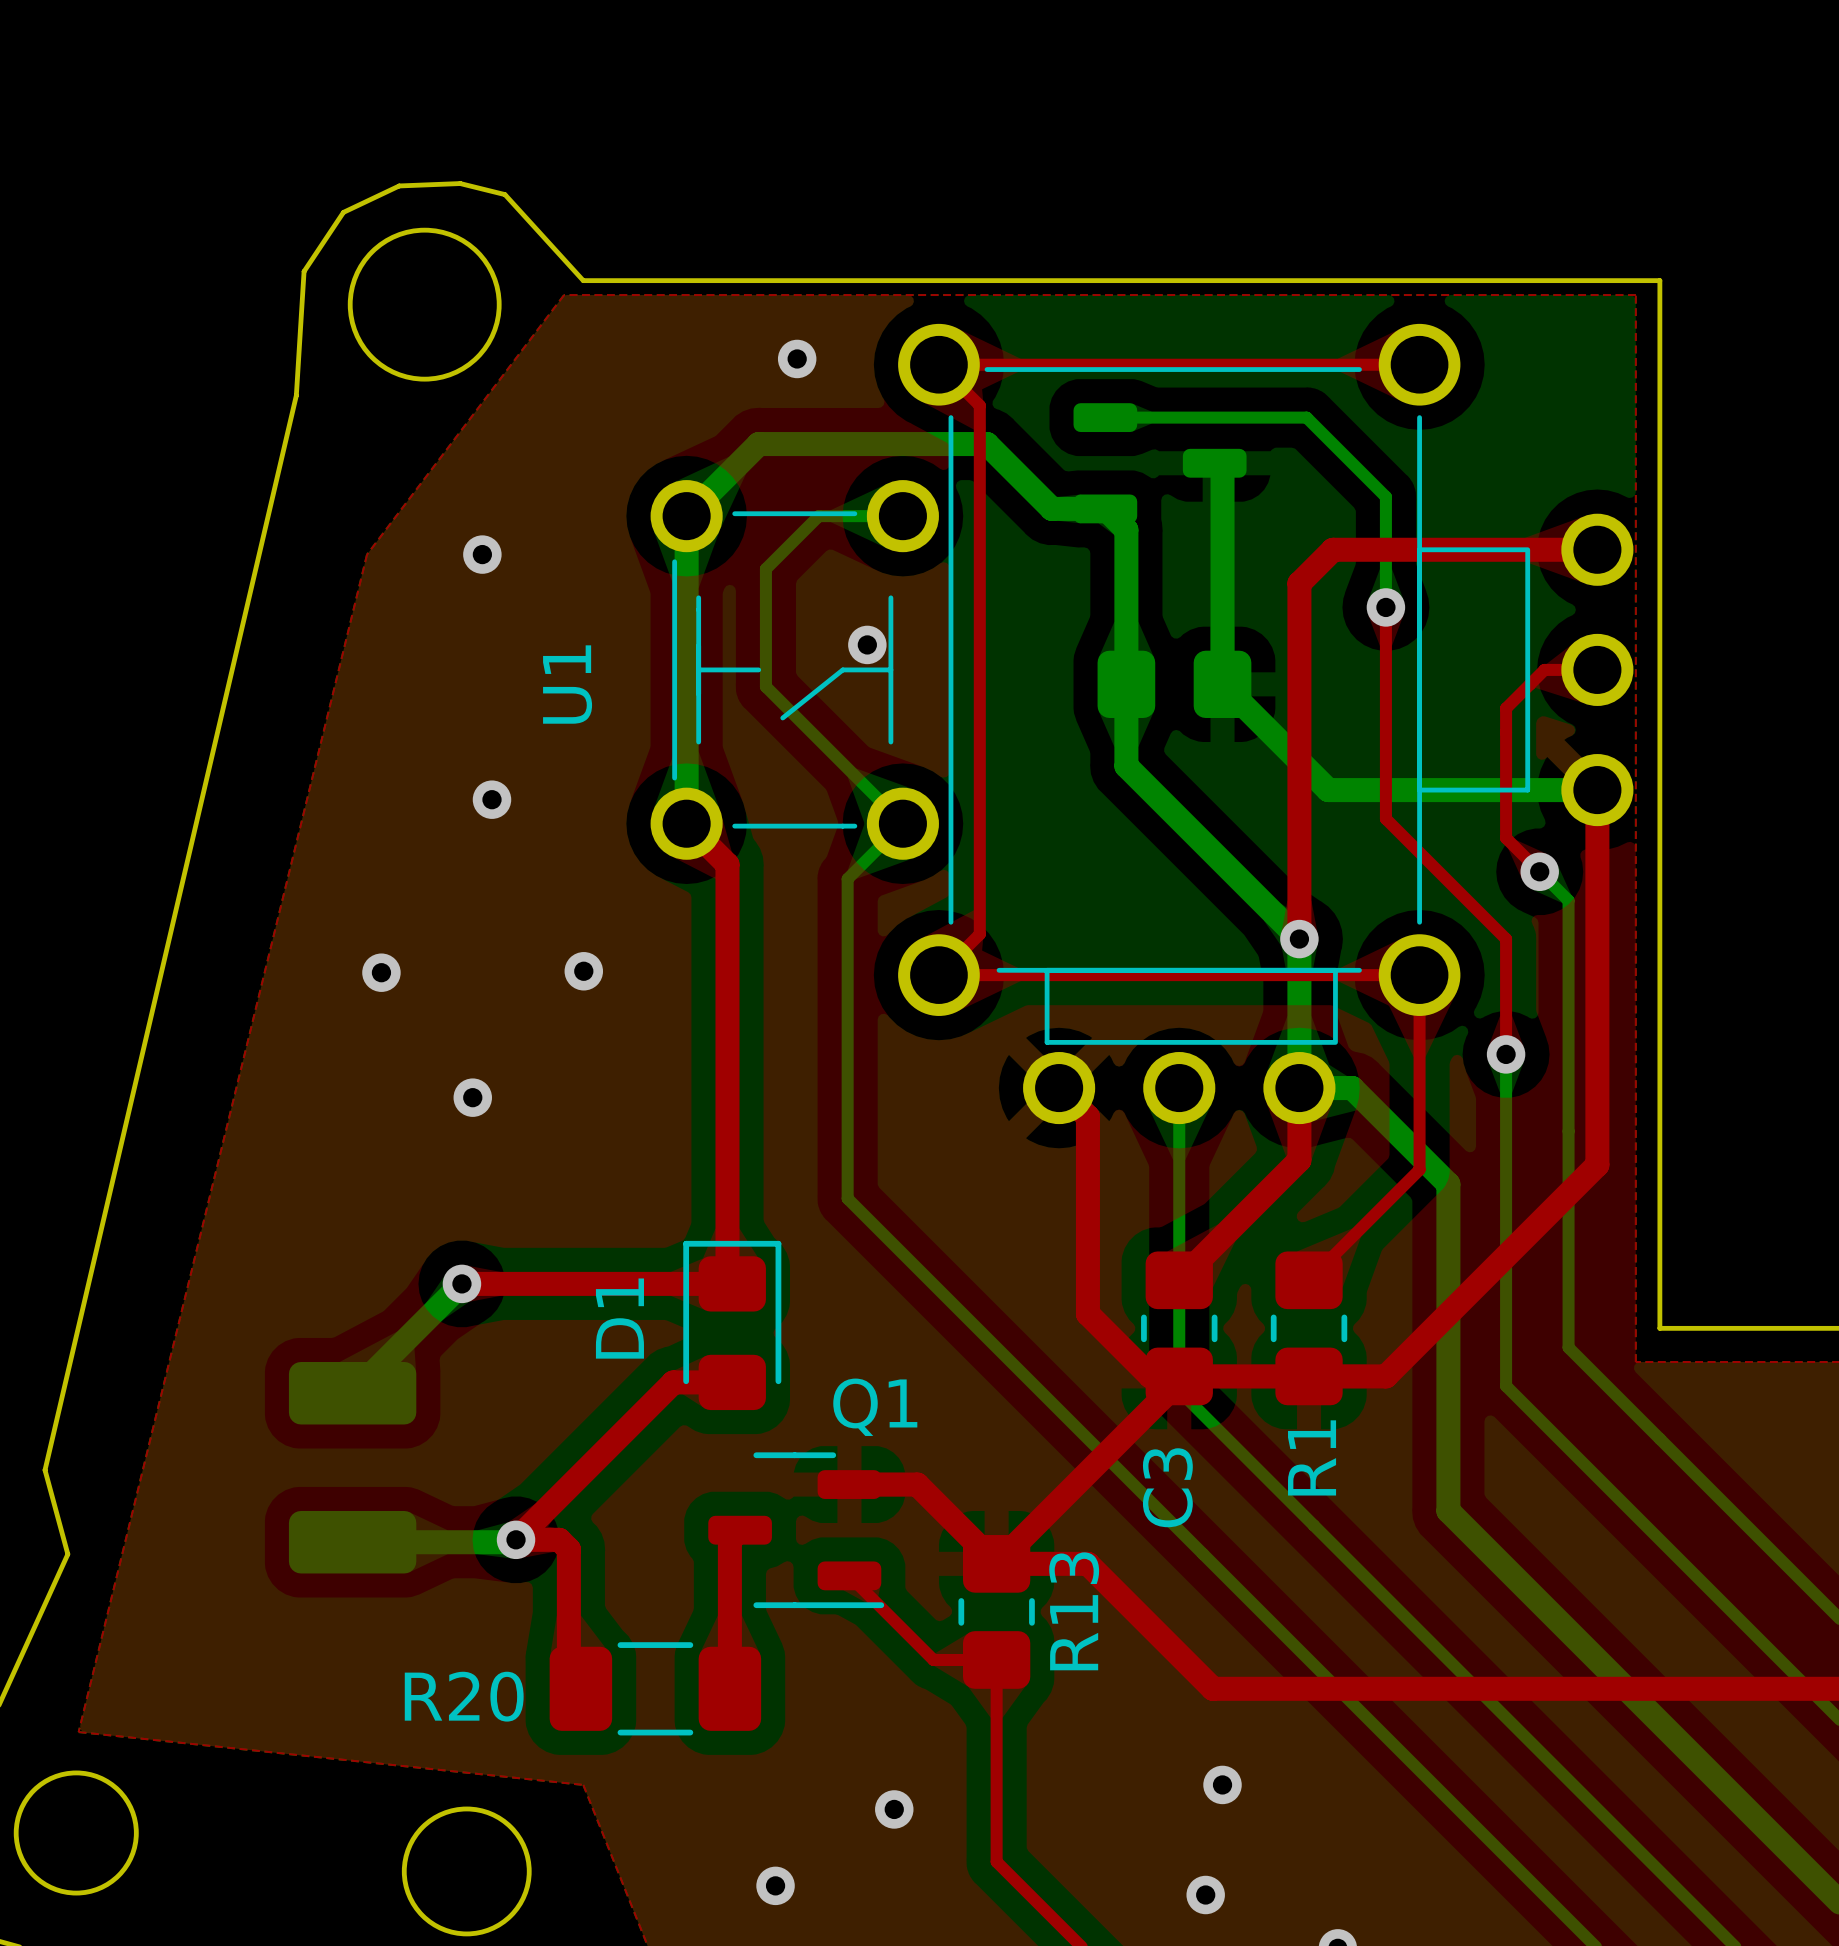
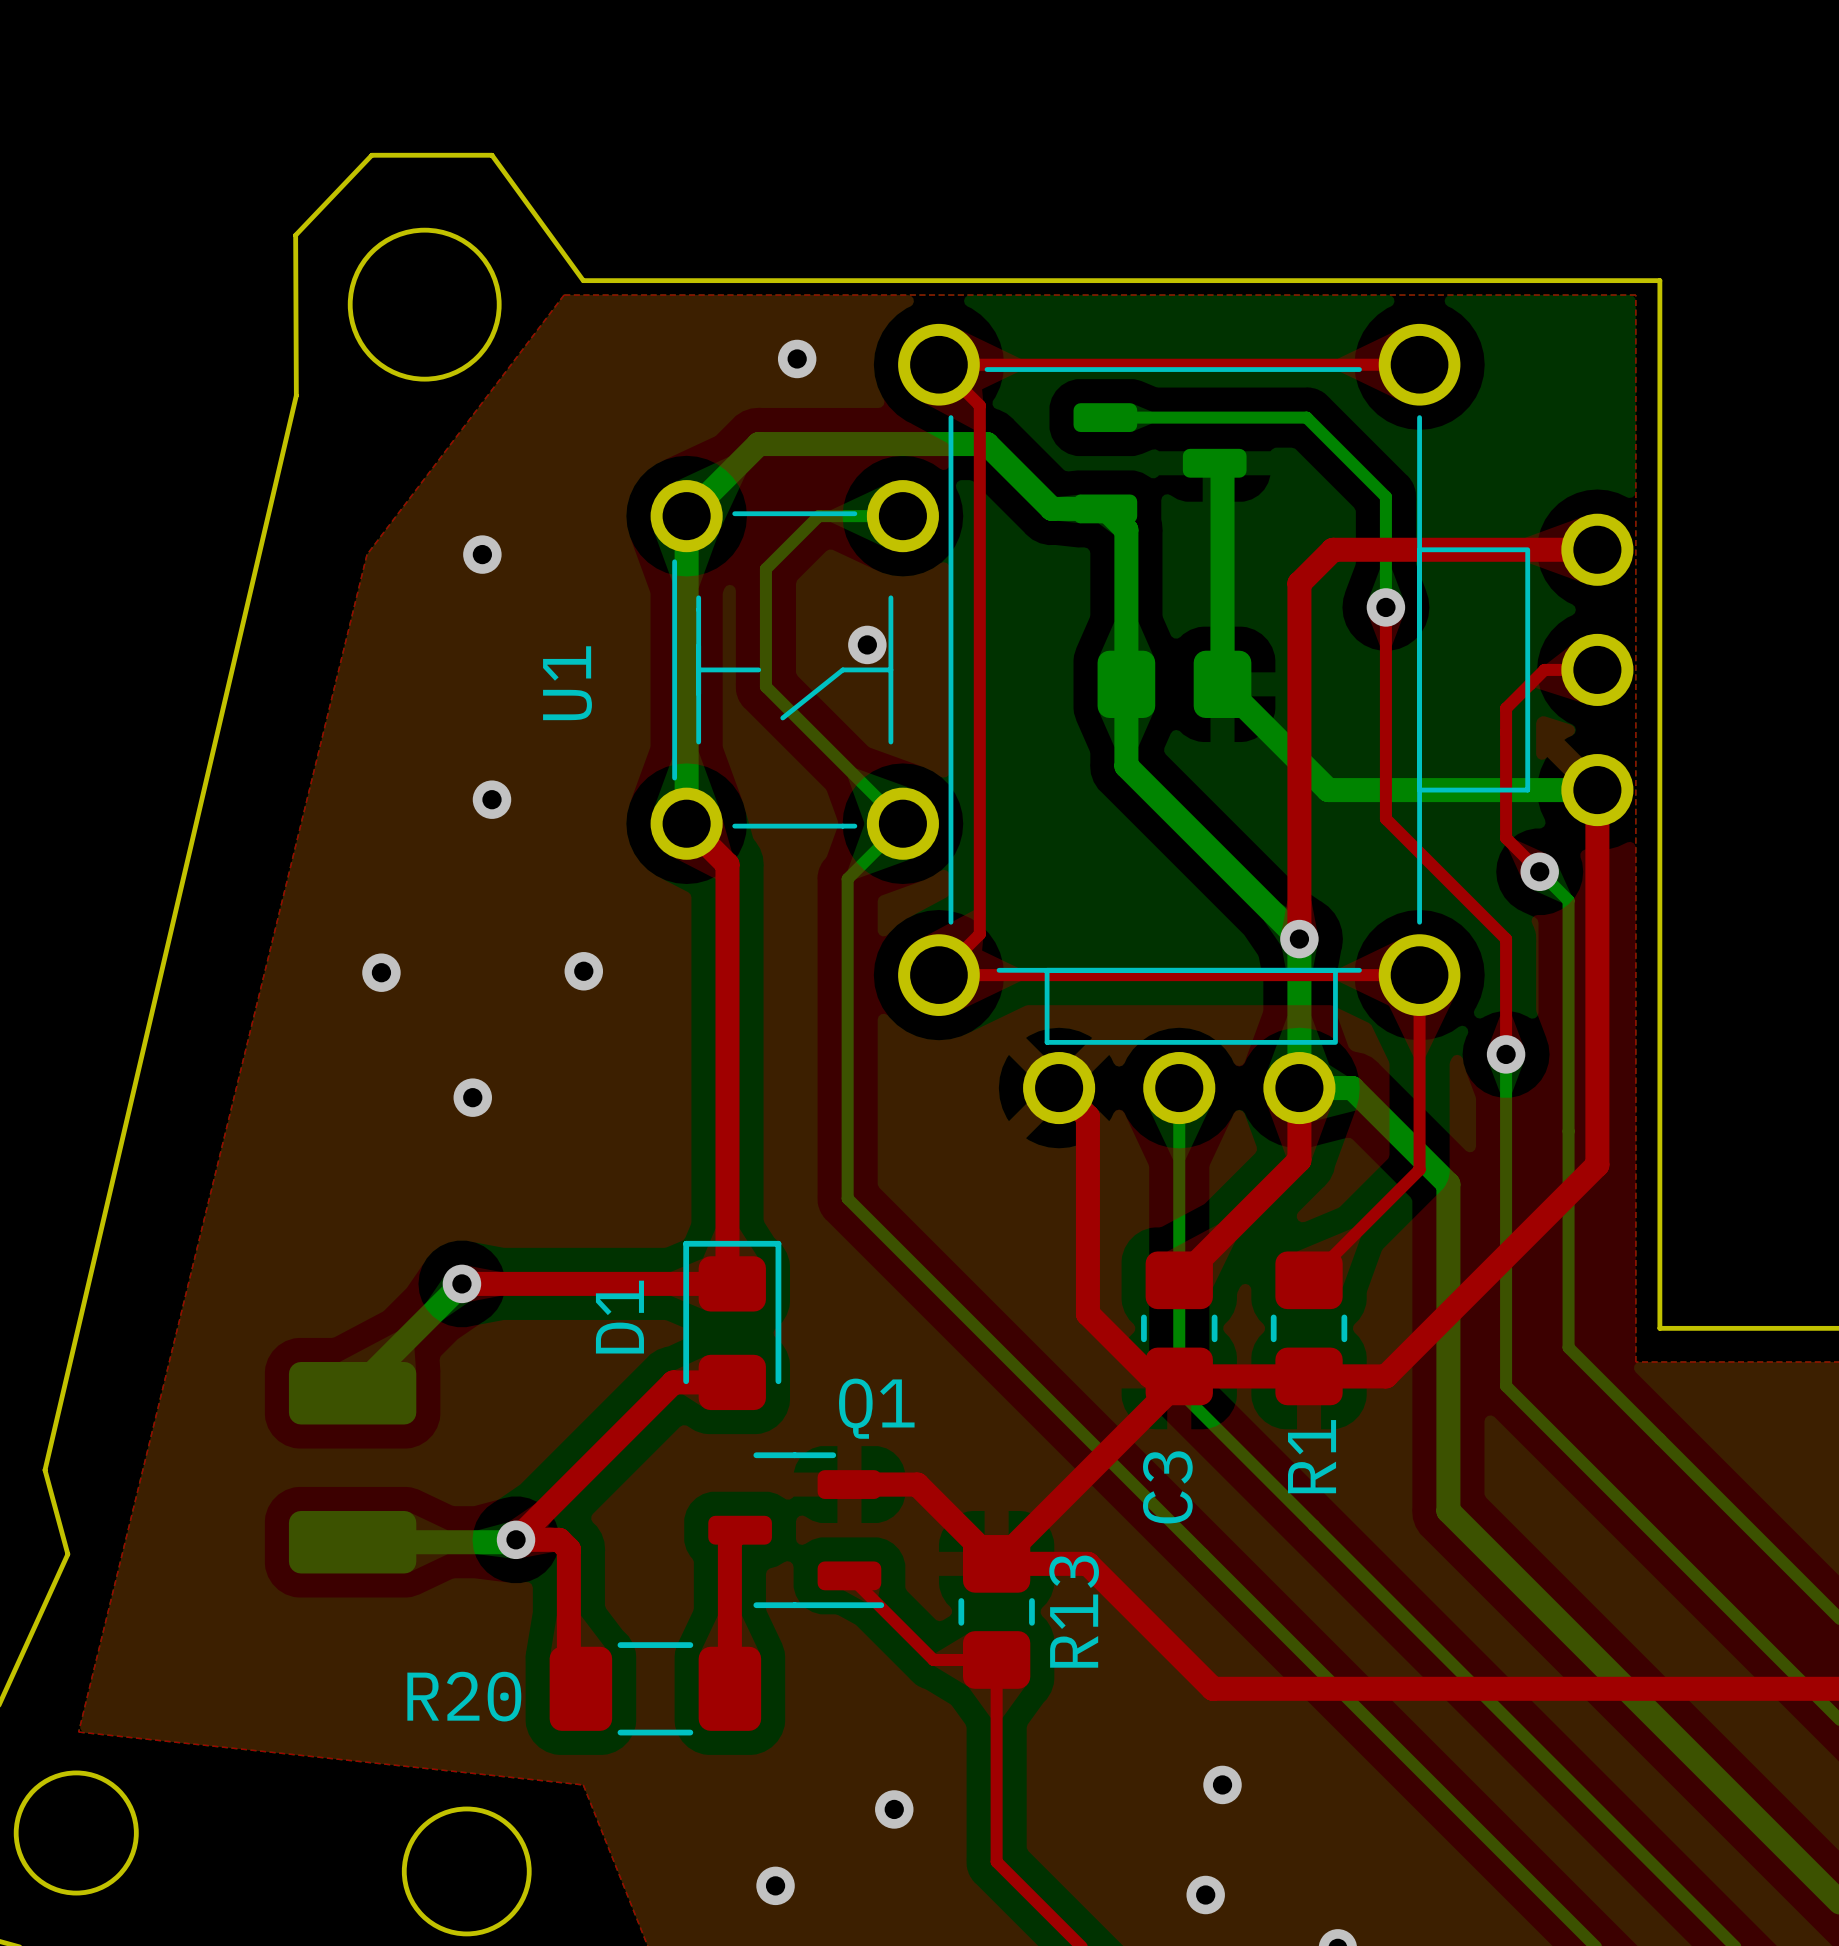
board edge: (583, 280) (504, 194) (460, 183) (399, 185) (343, 212) (304, 271) (296, 395) -> (583, 280) (491, 155) (371, 155) (295, 235) (296, 395)

